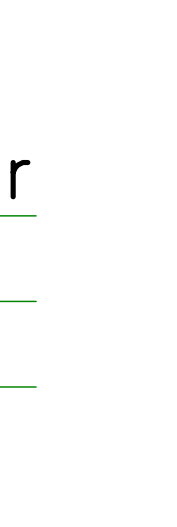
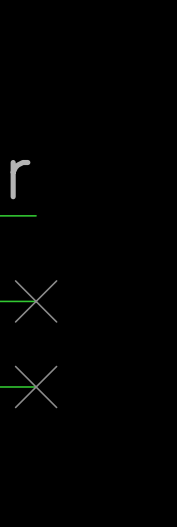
no-connect mark: none -> (36, 301)
no-connect mark: none -> (36, 386)

